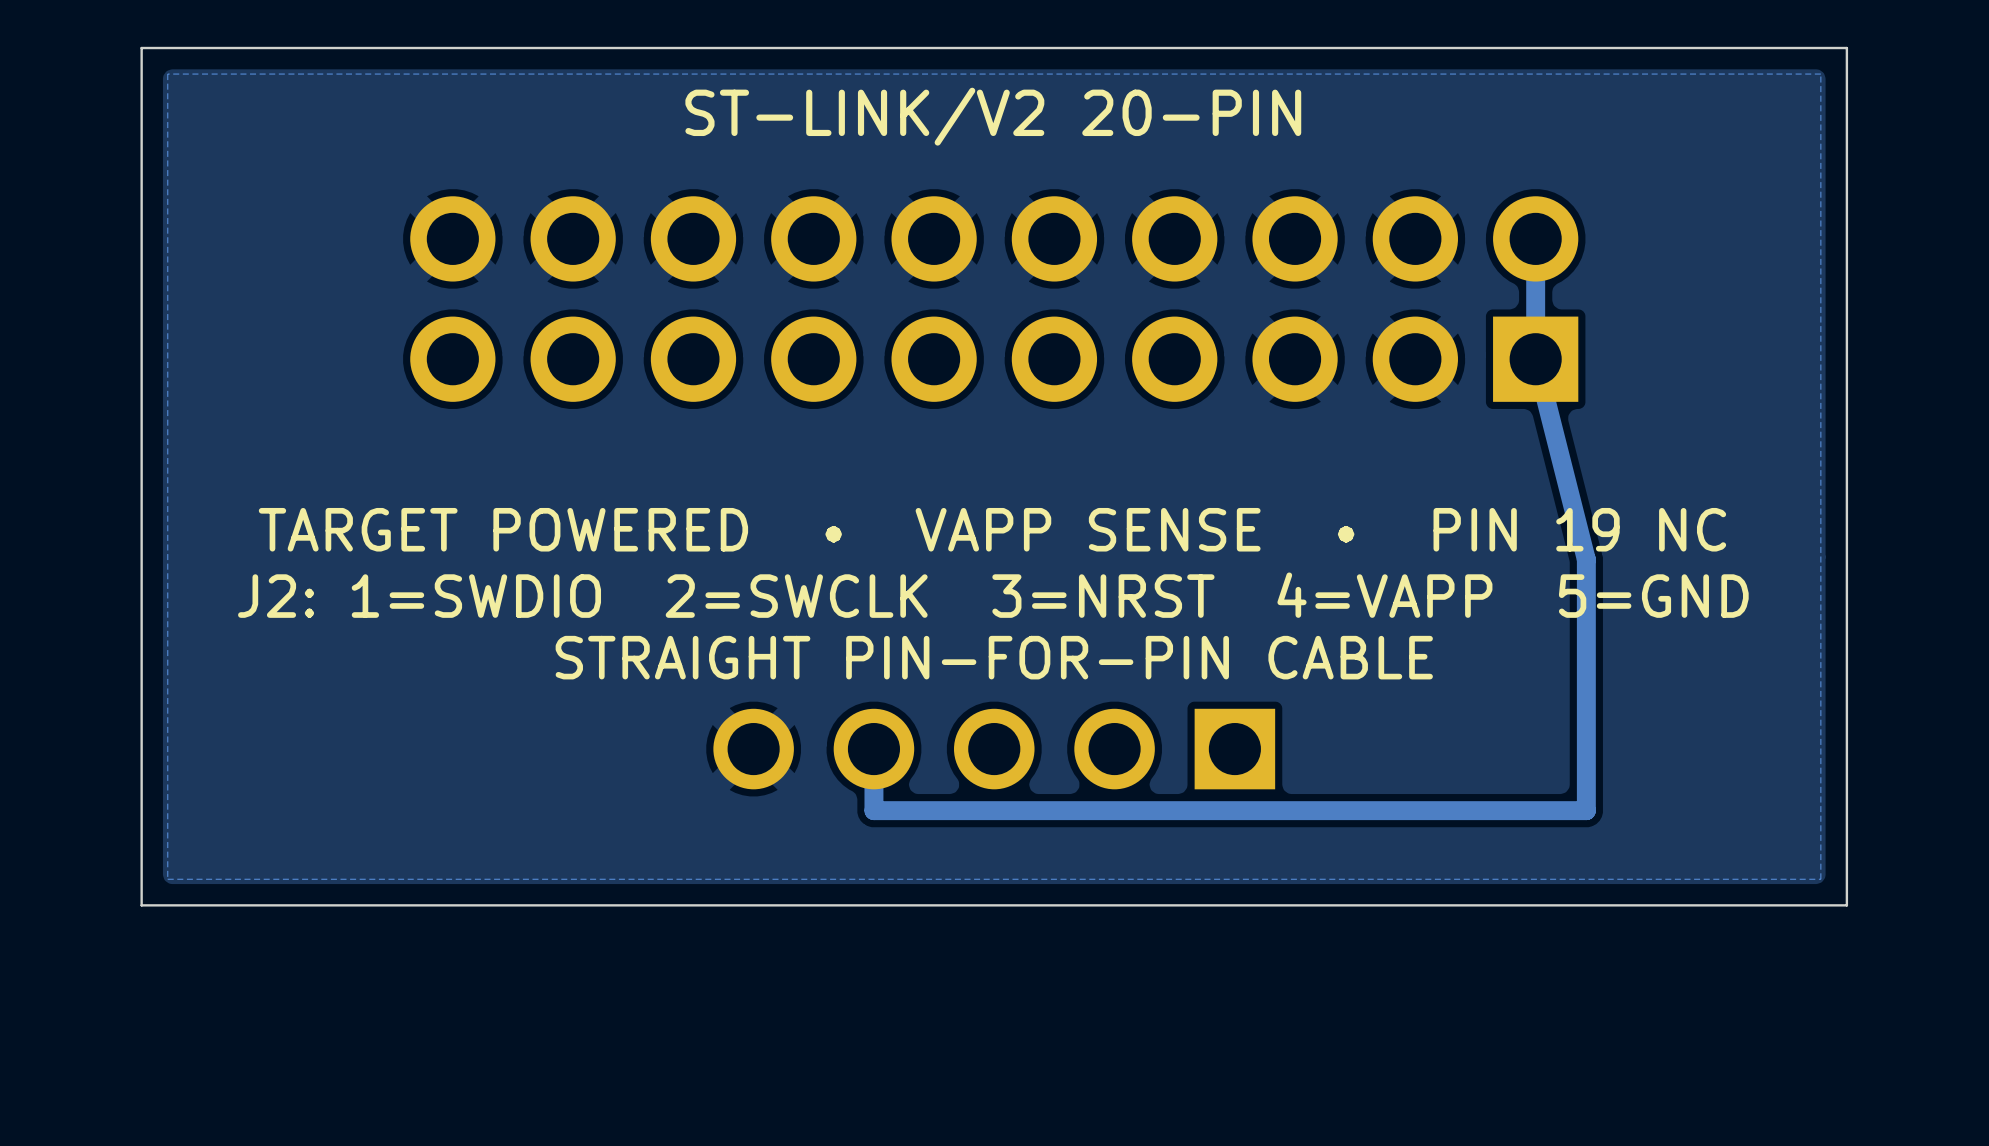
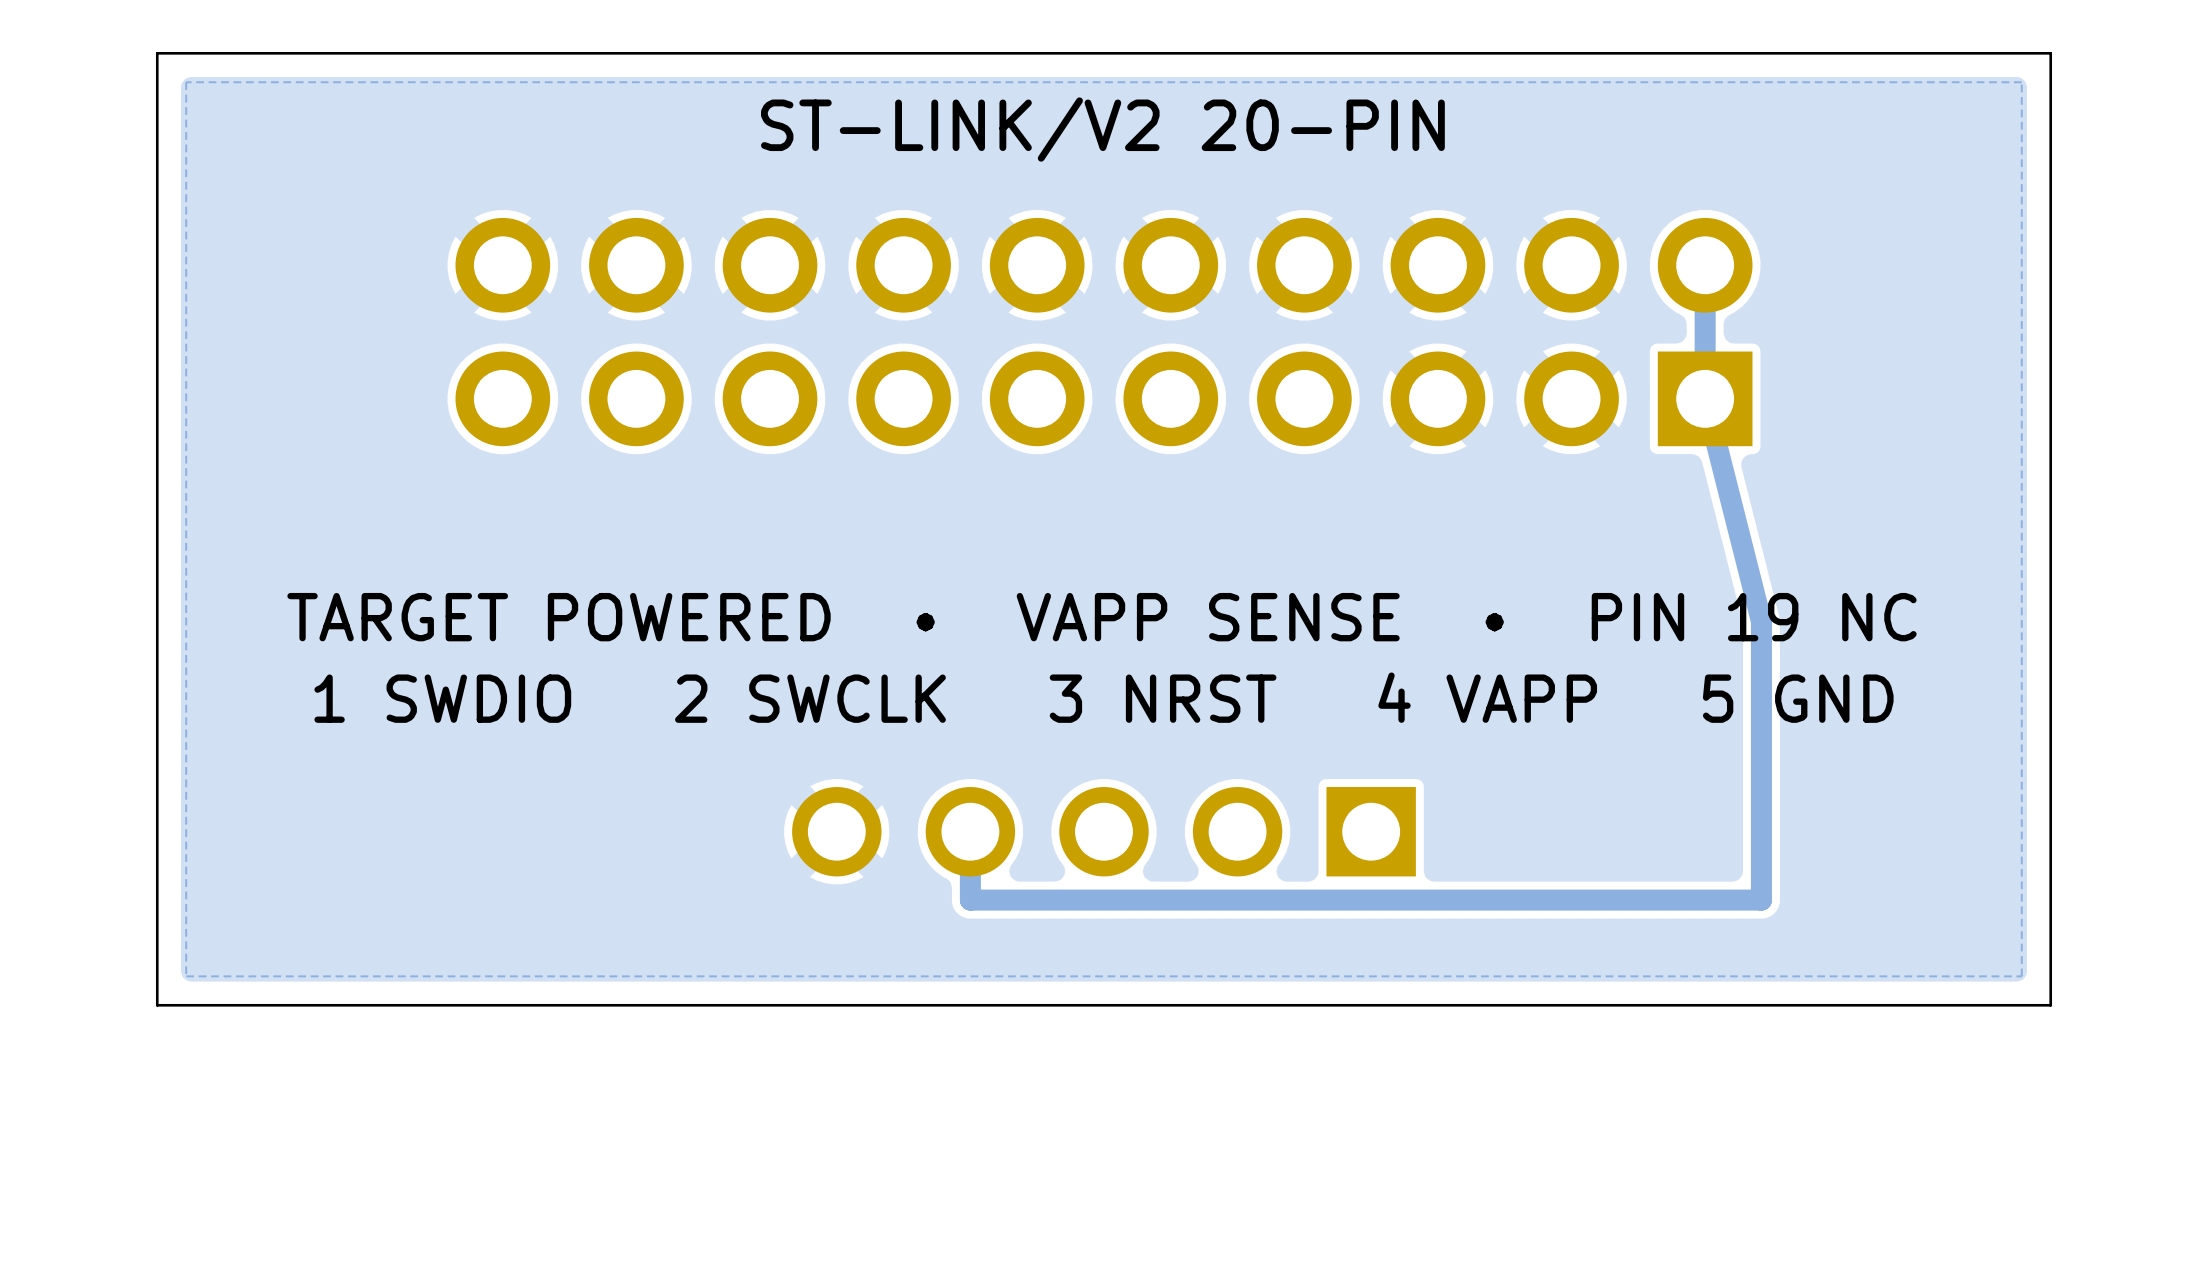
text position: TARGET POWERED • VAPP SENSE • PIN 19 NC (992, 529) -> TARGET POWERED • VAPP SENSE • PIN 19 NC (1101, 617)
text: J2: 1=SWDIO 2=SWCLK 3=NRST 4=VAPP 5=GND (993, 595) -> 1 SWDIO 2 SWCLK 3 NRST 4 VAPP 5 GND (1103, 697)
text: STRAIGHT PIN-FOR-PIN CABLE (994, 657) -> none

